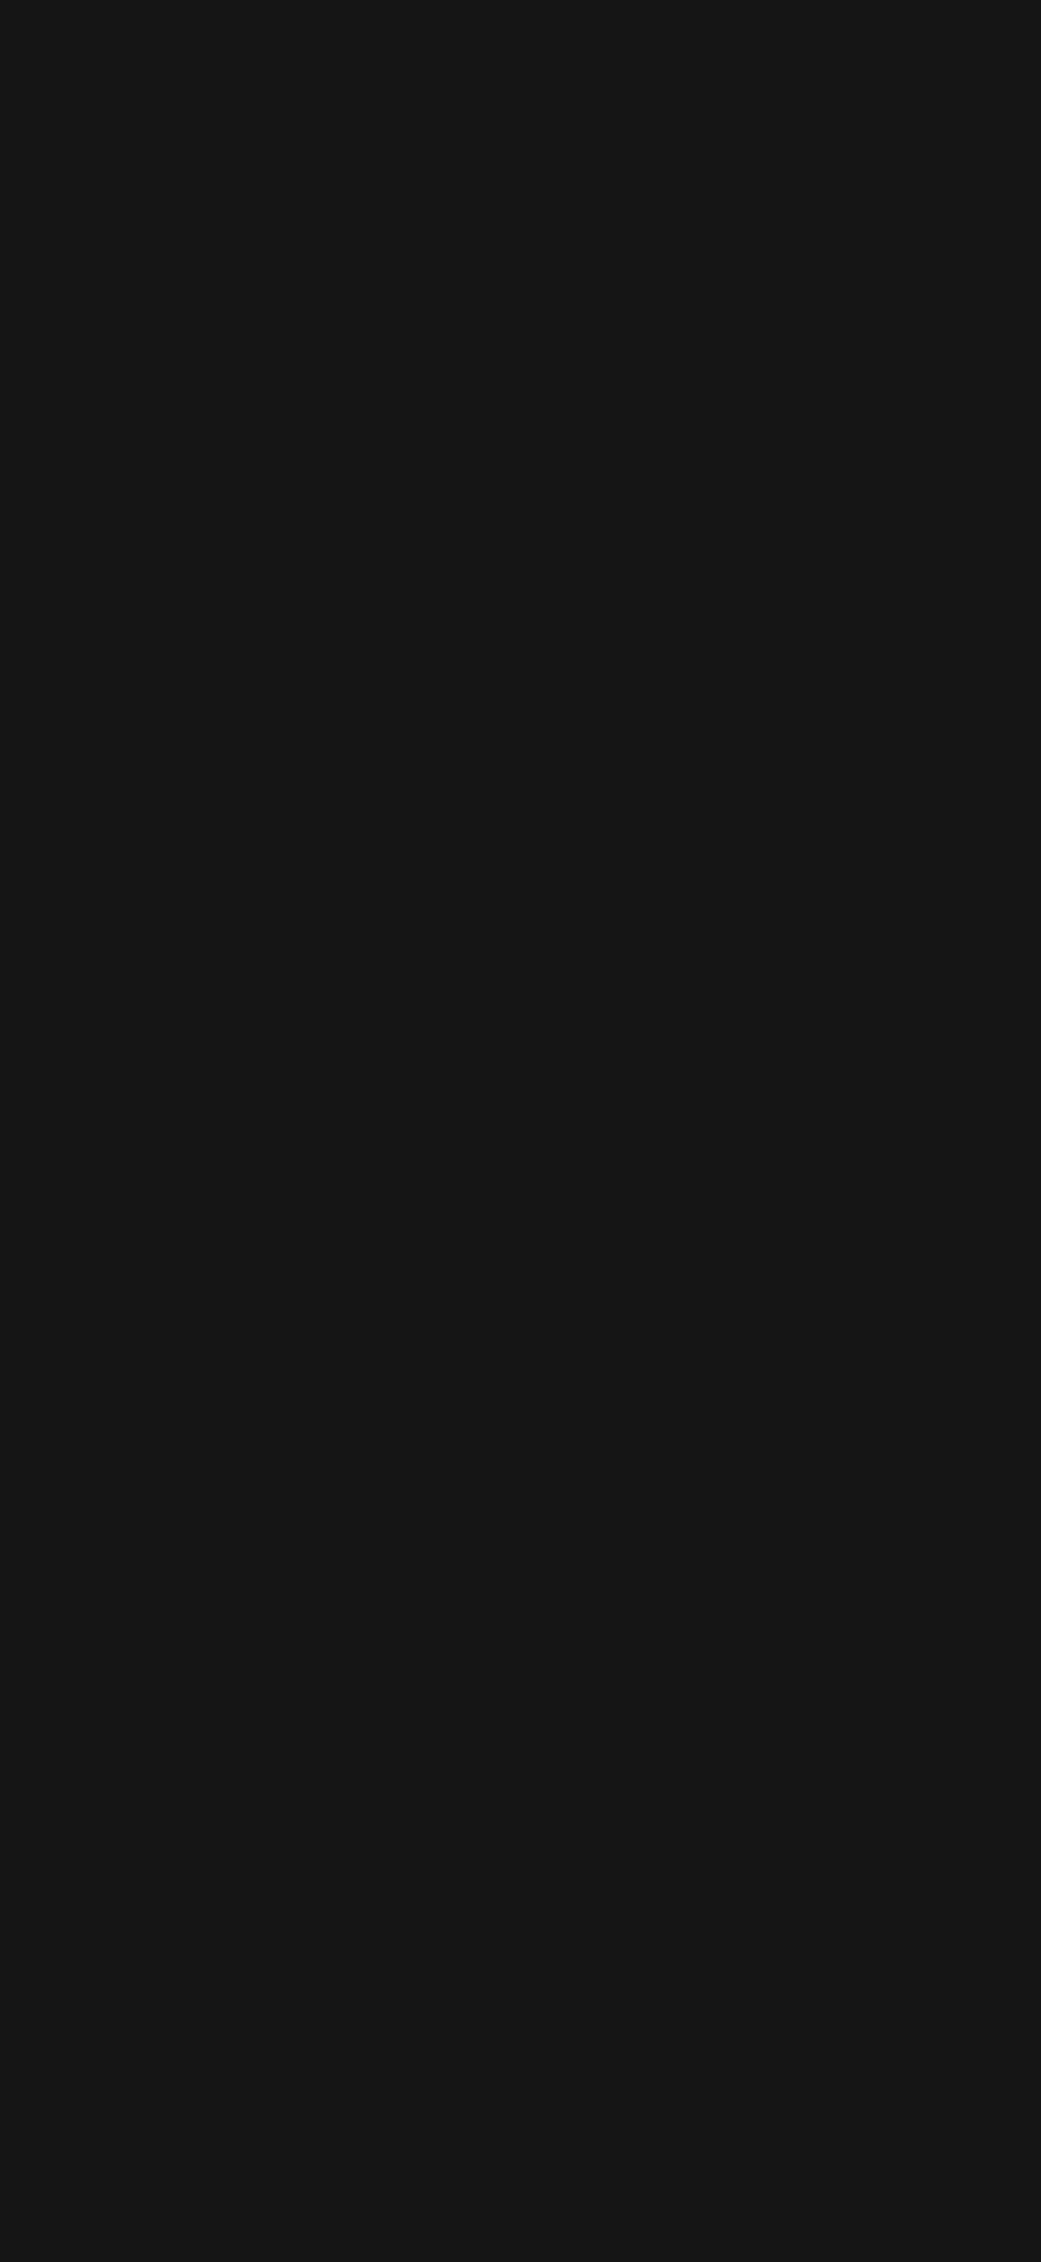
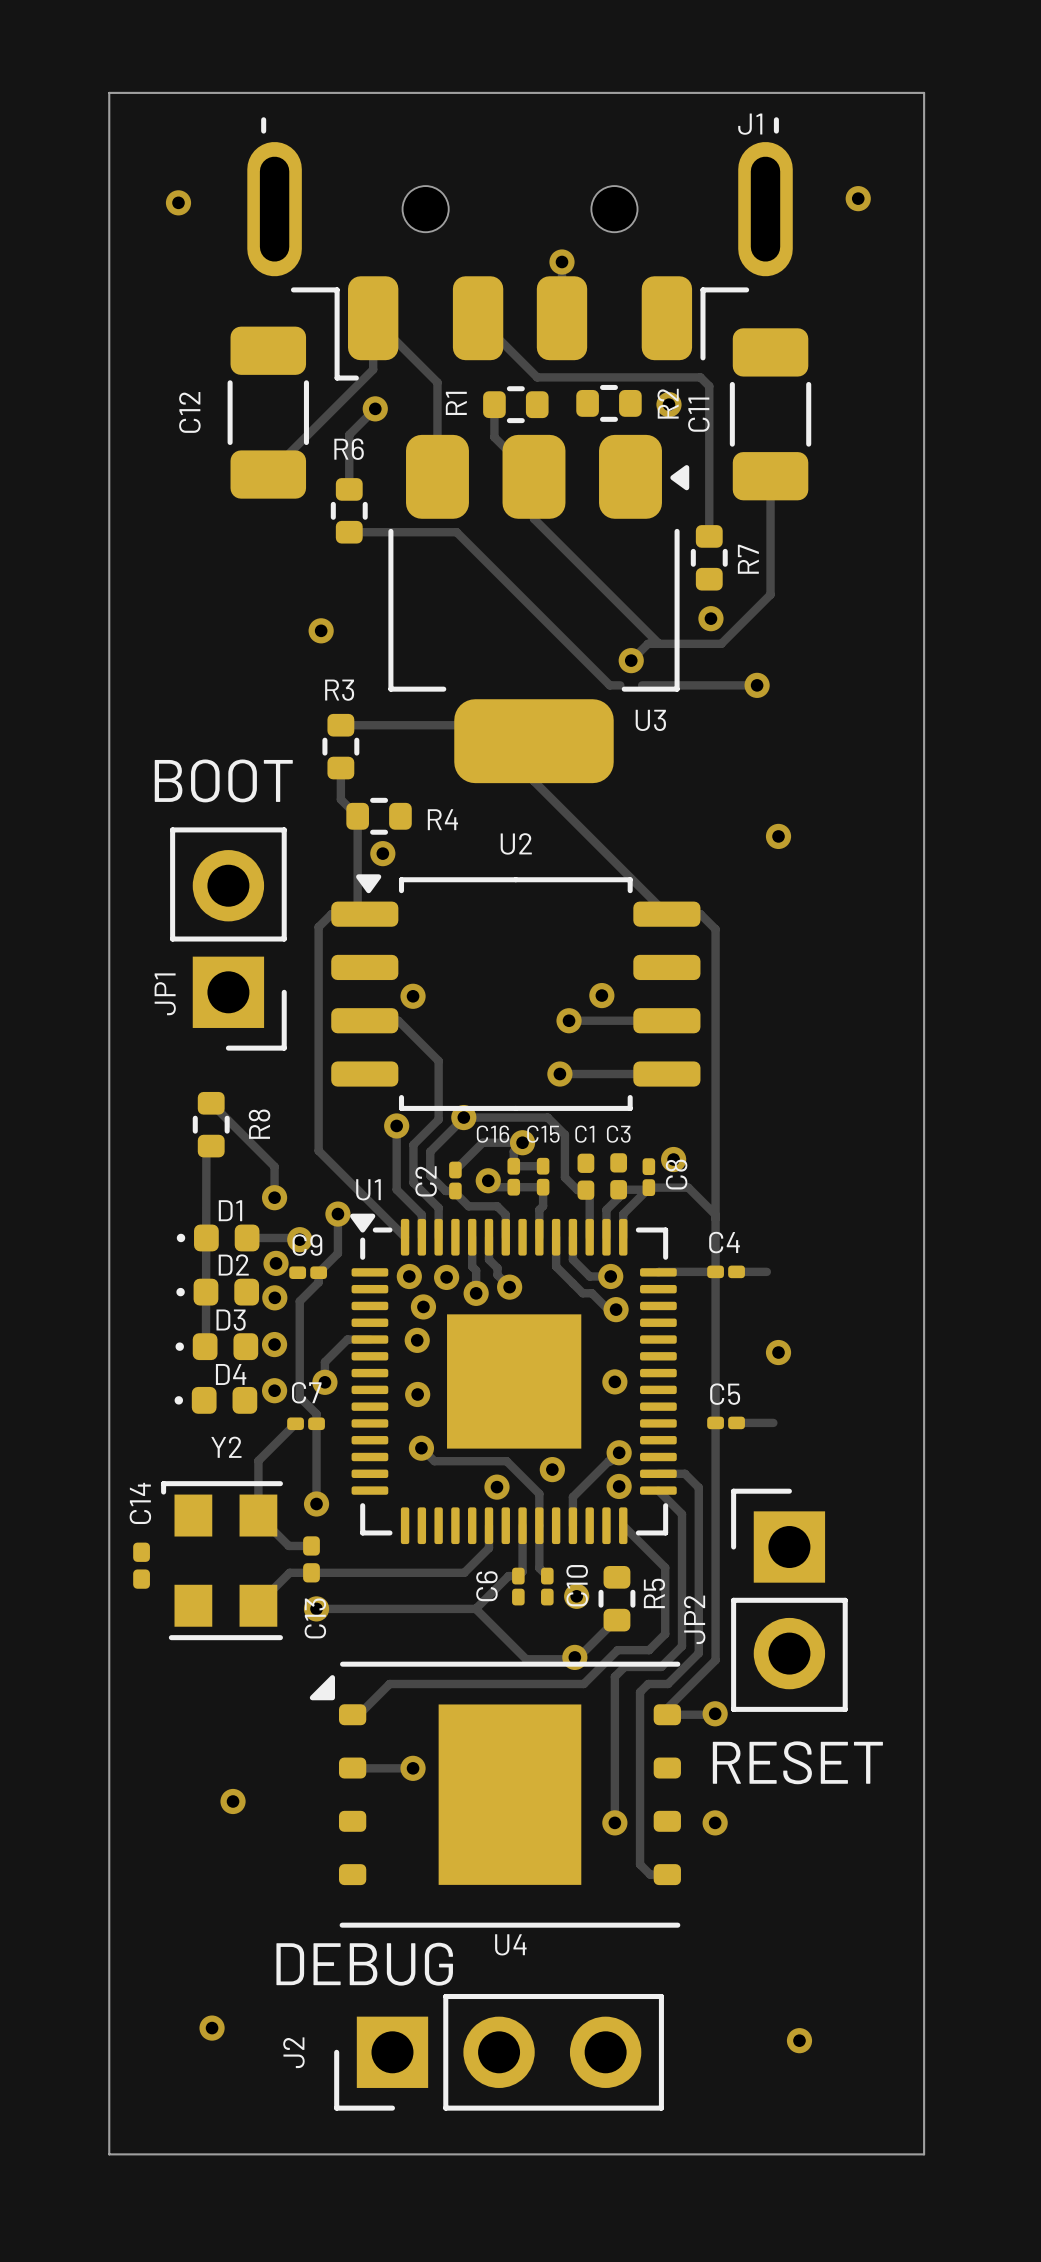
board edge: none -> (109, 92) (924, 92) (924, 2154) (109, 2154) (109, 92)
via: none -> (858, 198)
via: none -> (178, 202)
J1: none -> (520, 248)
via: none -> (562, 262)
track: none -> (478, 318) (537, 377) (700, 377) (709, 386) (709, 536)
R2: none -> (608, 403)
track: none -> (494, 404) (494, 437) (533, 476) (533, 518) (659, 643)
R1: none -> (515, 404)
via: none -> (668, 404)
track: none -> (375, 408) (349, 434) (349, 489)
via: none -> (375, 408)
C12: none -> (268, 412)
C11: none -> (770, 414)
track: none -> (268, 474) (373, 369) (373, 318) (437, 382) (437, 476)
track: none -> (770, 476) (770, 594) (721, 643) (648, 643) (631, 660)
R6: none -> (349, 510)
track: none -> (349, 532) (456, 532) (609, 685) (620, 685)
R7: none -> (709, 557)
U3: none -> (538, 609)
via: none -> (710, 618)
via: none -> (321, 630)
via: none -> (631, 660)
track: none -> (642, 685) (757, 685)
via: none -> (757, 685)
track: none -> (340, 725) (518, 725) (533, 741) (533, 781) (666, 914) (700, 914) (715, 929) (715, 1660) (661, 1714) (715, 1713)
R3: none -> (340, 746)
track: none -> (340, 768) (340, 799) (357, 816) (357, 907) (364, 914) (331, 914) (318, 927) (318, 1150) (405, 1237)
text: none -> BOOT (223, 780)
R4: none -> (379, 816)
via: none -> (778, 836)
via: none -> (382, 853)
JP1: none -> (228, 939)
U2: none -> (515, 992)
via: none -> (601, 995)
via: none -> (413, 996)
track: none -> (364, 1020) (398, 1020) (438, 1061) (438, 1119) (413, 1144) (413, 1182) (438, 1207) (438, 1237)
track: none -> (569, 1020) (666, 1020)
via: none -> (569, 1020)
track: none -> (559, 1074) (666, 1074)
via: none -> (559, 1074)
track: none -> (211, 1103) (274, 1166) (274, 1197)
track: none -> (463, 1117) (547, 1117) (564, 1134) (564, 1177) (577, 1190) (585, 1190) (589, 1193) (589, 1237)
via: none -> (463, 1117)
track: none -> (463, 1118) (430, 1151) (430, 1175) (445, 1190) (455, 1190) (468, 1206) (497, 1206) (505, 1214) (505, 1237)
R8: none -> (211, 1124)
track: none -> (396, 1125) (396, 1189) (421, 1214) (421, 1237)
via: none -> (396, 1125)
via: none -> (522, 1142)
track: none -> (206, 1150) (205, 1345)
via: none -> (673, 1159)
track: none -> (543, 1166) (513, 1166) (513, 1151) (522, 1142) (482, 1142) (455, 1170)
C16: none -> (513, 1176)
C15: none -> (543, 1176)
C1: none -> (585, 1176)
C3: none -> (618, 1176)
C8: none -> (648, 1177)
C2: none -> (455, 1180)
track: none -> (488, 1180) (494, 1187) (543, 1187) (543, 1206) (539, 1209) (539, 1237)
via: none -> (488, 1180)
track: none -> (648, 1188) (623, 1214) (623, 1237)
via: none -> (274, 1197)
track: none -> (337, 1214) (337, 1253) (318, 1272) (318, 1282) (299, 1301) (299, 1397) (316, 1414) (316, 1504)
via: none -> (337, 1214)
track: none -> (715, 1214) (688, 1187) (618, 1189) (618, 1197) (606, 1209) (606, 1237)
D1: none -> (218, 1237)
track: none -> (472, 1237) (472, 1266) (476, 1270) (476, 1293)
track: none -> (488, 1237) (488, 1259) (497, 1268) (497, 1275) (509, 1287)
track: none -> (556, 1237) (556, 1266) (582, 1293) (591, 1293) (608, 1309) (616, 1309)
track: none -> (572, 1237) (572, 1259) (589, 1276) (610, 1276)
track: none -> (248, 1239) (247, 1237) (298, 1237) (299, 1239)
via: none -> (299, 1239)
via: none -> (276, 1263)
track: none -> (658, 1271) (715, 1271)
C4: none -> (726, 1271)
track: none -> (736, 1271) (766, 1271)
C9: none -> (308, 1272)
via: none -> (409, 1276)
via: none -> (610, 1276)
via: none -> (446, 1277)
via: none -> (509, 1287)
D2: none -> (217, 1292)
via: none -> (476, 1293)
via: none -> (274, 1297)
via: none -> (423, 1306)
via: none -> (616, 1309)
track: none -> (369, 1339) (347, 1339) (324, 1362) (324, 1382)
via: none -> (417, 1340)
via: none -> (274, 1344)
D3: none -> (216, 1346)
via: none -> (778, 1352)
U1: none -> (513, 1378)
via: none -> (614, 1381)
via: none -> (324, 1382)
via: none -> (274, 1390)
via: none -> (417, 1394)
D4: none -> (215, 1400)
C5: none -> (726, 1422)
track: none -> (736, 1422) (773, 1422)
track: none -> (295, 1423) (258, 1460) (258, 1515) (288, 1545) (311, 1545)
C7: none -> (306, 1423)
track: none -> (421, 1448) (434, 1461) (506, 1461) (539, 1493) (539, 1568) (547, 1576)
via: none -> (421, 1448)
track: none -> (619, 1452) (572, 1497) (572, 1525)
via: none -> (619, 1452)
via: none -> (552, 1469)
track: none -> (658, 1473) (684, 1473) (698, 1487) (698, 1653) (668, 1684) (648, 1684) (640, 1692) (640, 1864) (650, 1874) (661, 1874)
via: none -> (619, 1486)
via: none -> (496, 1487)
track: none -> (658, 1490) (682, 1514) (682, 1646) (661, 1666) (624, 1666) (614, 1676) (614, 1822)
via: none -> (316, 1504)
track: none -> (488, 1525) (488, 1548) (464, 1572) (289, 1572) (258, 1605)
track: none -> (522, 1525) (522, 1571) (518, 1576) (508, 1576) (475, 1608)
track: none -> (623, 1525) (665, 1567) (665, 1634) (649, 1650) (617, 1650) (583, 1684) (389, 1684) (358, 1714)
C13: none -> (311, 1559)
Y2: none -> (222, 1560)
C14: none -> (141, 1565)
C6: none -> (518, 1586)
C10: none -> (547, 1586)
via: none -> (576, 1596)
R5: none -> (616, 1598)
JP2: none -> (789, 1600)
track: none -> (316, 1608) (475, 1608)
via: none -> (316, 1608)
track: none -> (475, 1608) (526, 1659) (572, 1659) (578, 1657) (616, 1620)
via: none -> (574, 1657)
via: none -> (715, 1713)
text: none -> RESET (797, 1762)
track: none -> (359, 1768) (413, 1768)
via: none -> (413, 1768)
U4: none -> (495, 1794)
via: none -> (233, 1801)
via: none -> (614, 1822)
via: none -> (715, 1822)
text: none -> DEBUG (364, 1964)
via: none -> (212, 2028)
via: none -> (799, 2040)
J2: none -> (499, 2052)

